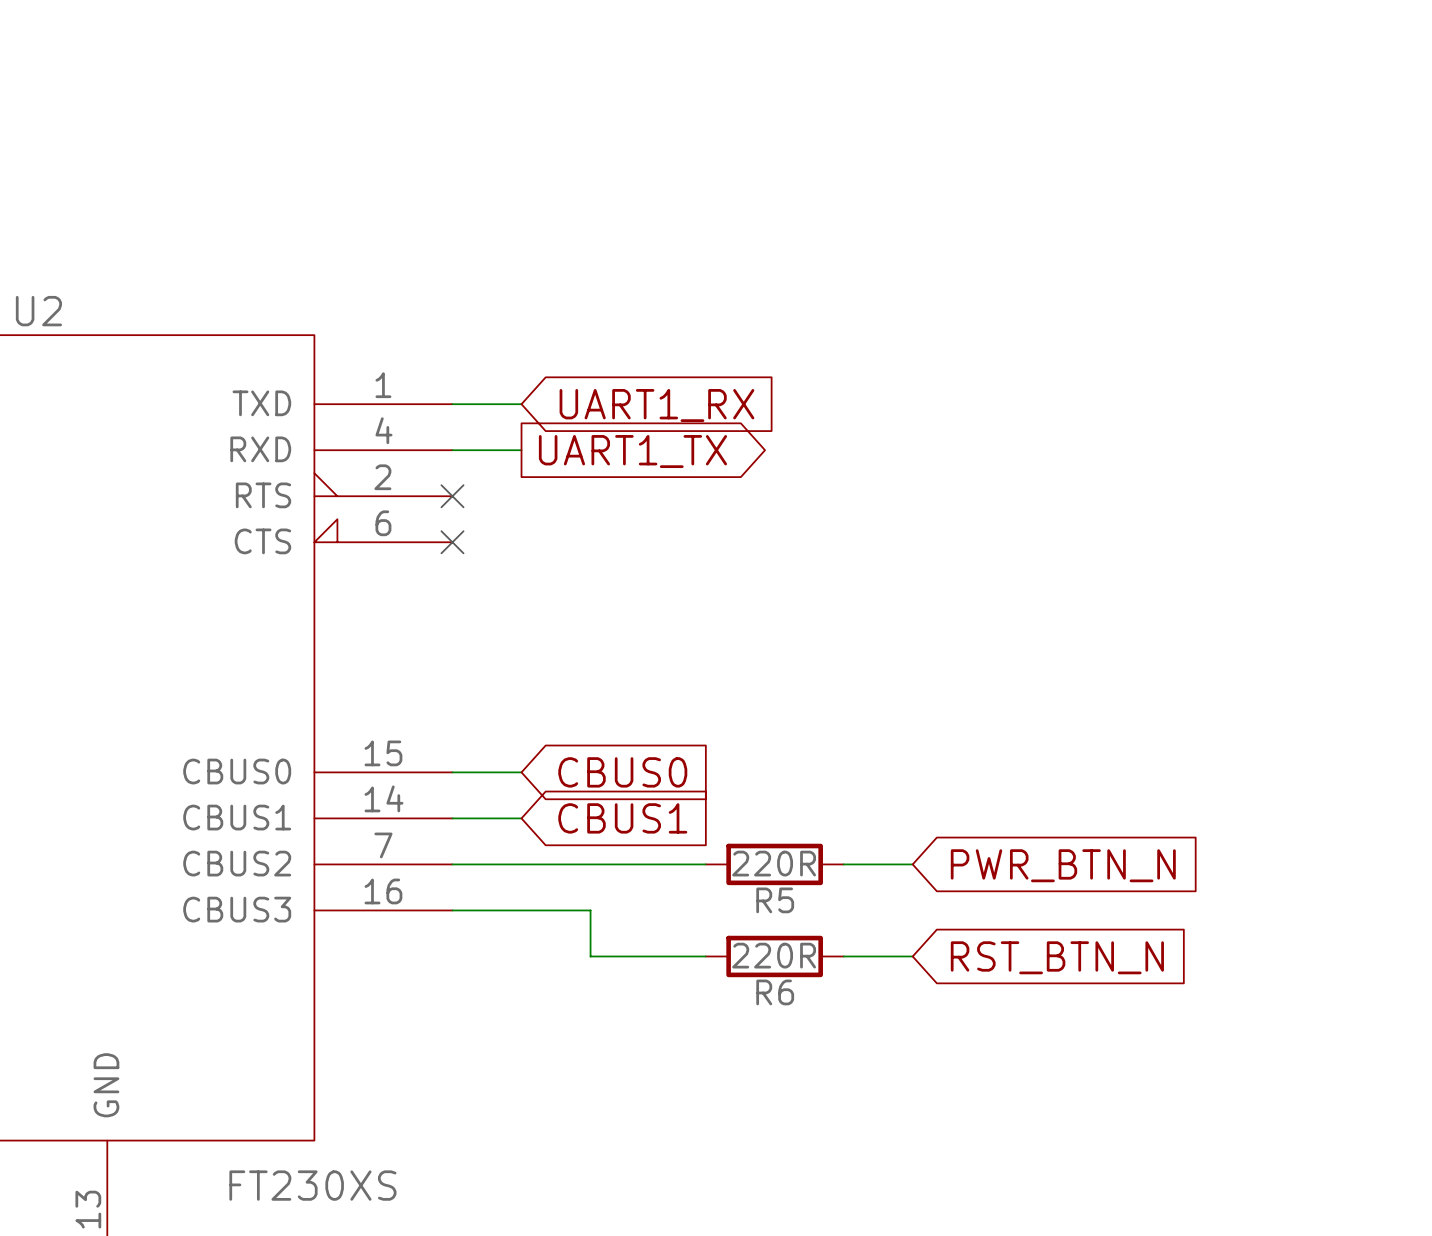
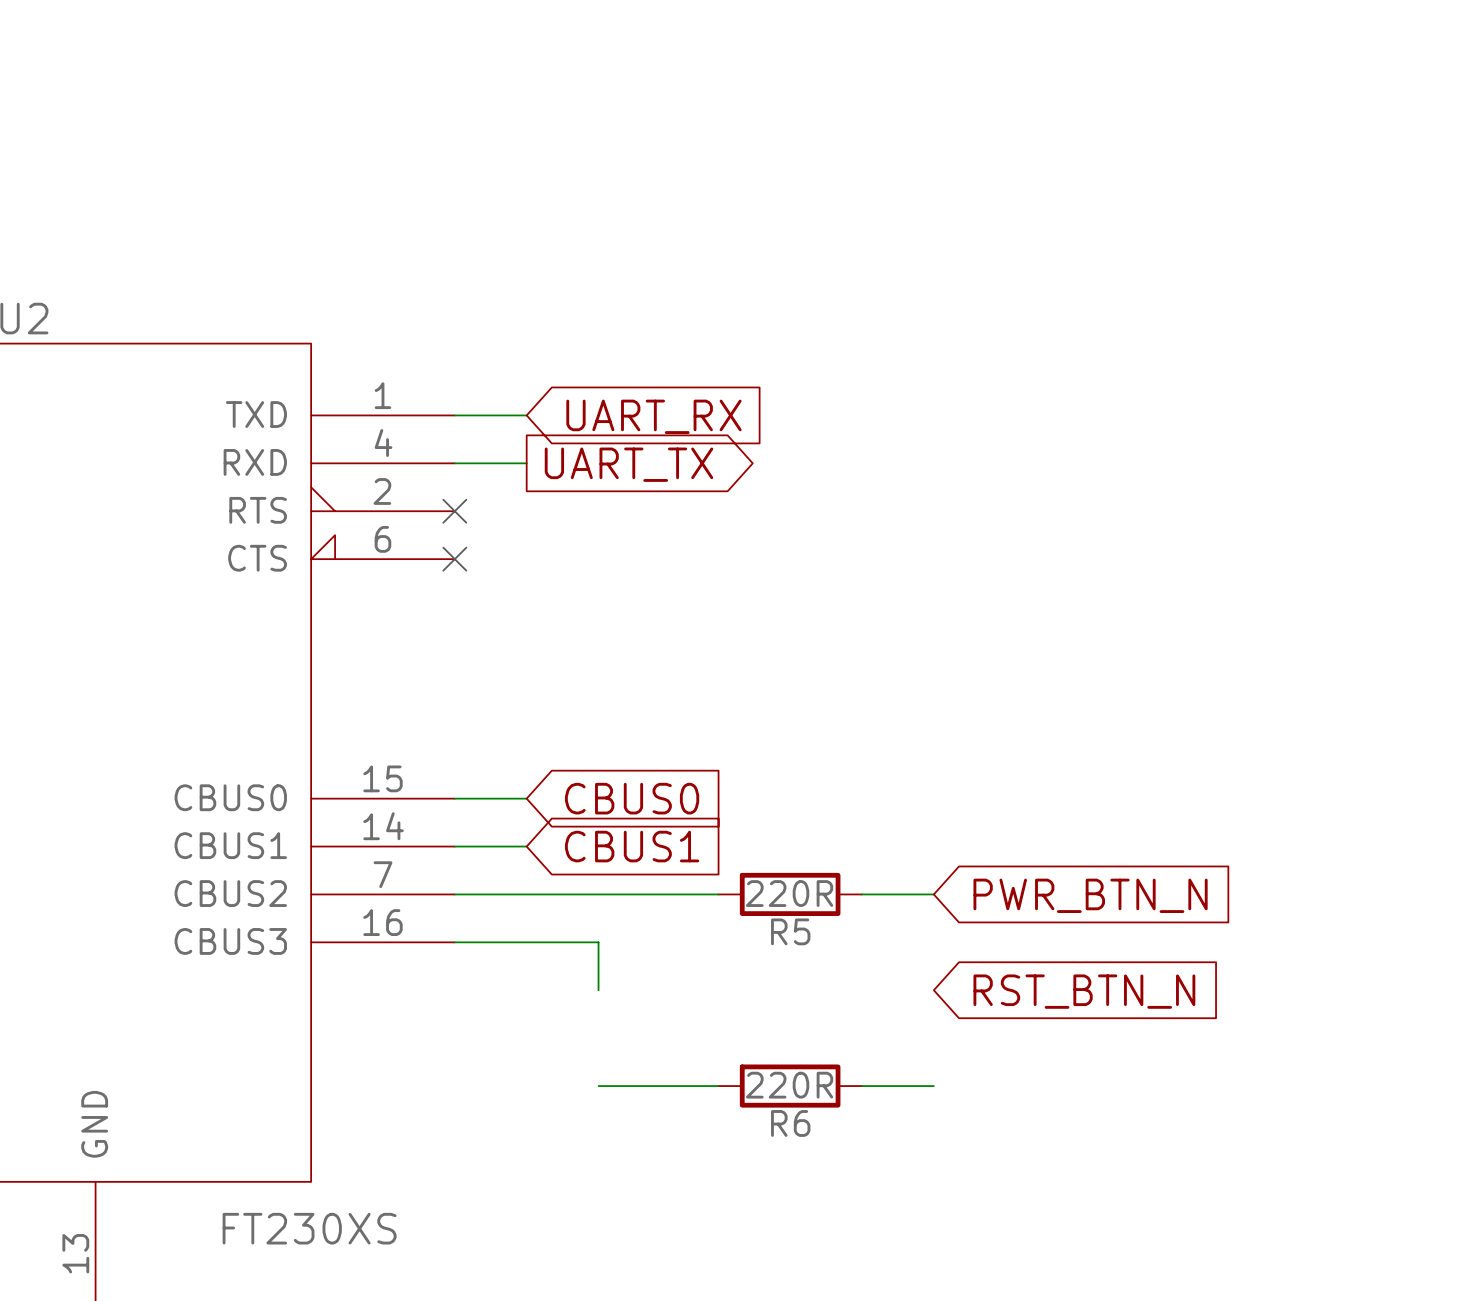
global label: UART1_RX (656, 405) -> UART_RX (653, 416)
global label: UART1_TX (632, 451) -> UART_TX (628, 464)
wire: (590, 956) (705, 956) -> (598, 1086) (718, 1086)
R6 position: (774, 956) -> (790, 1086)
wire: (843, 956) (912, 956) -> (861, 1086) (933, 1086)

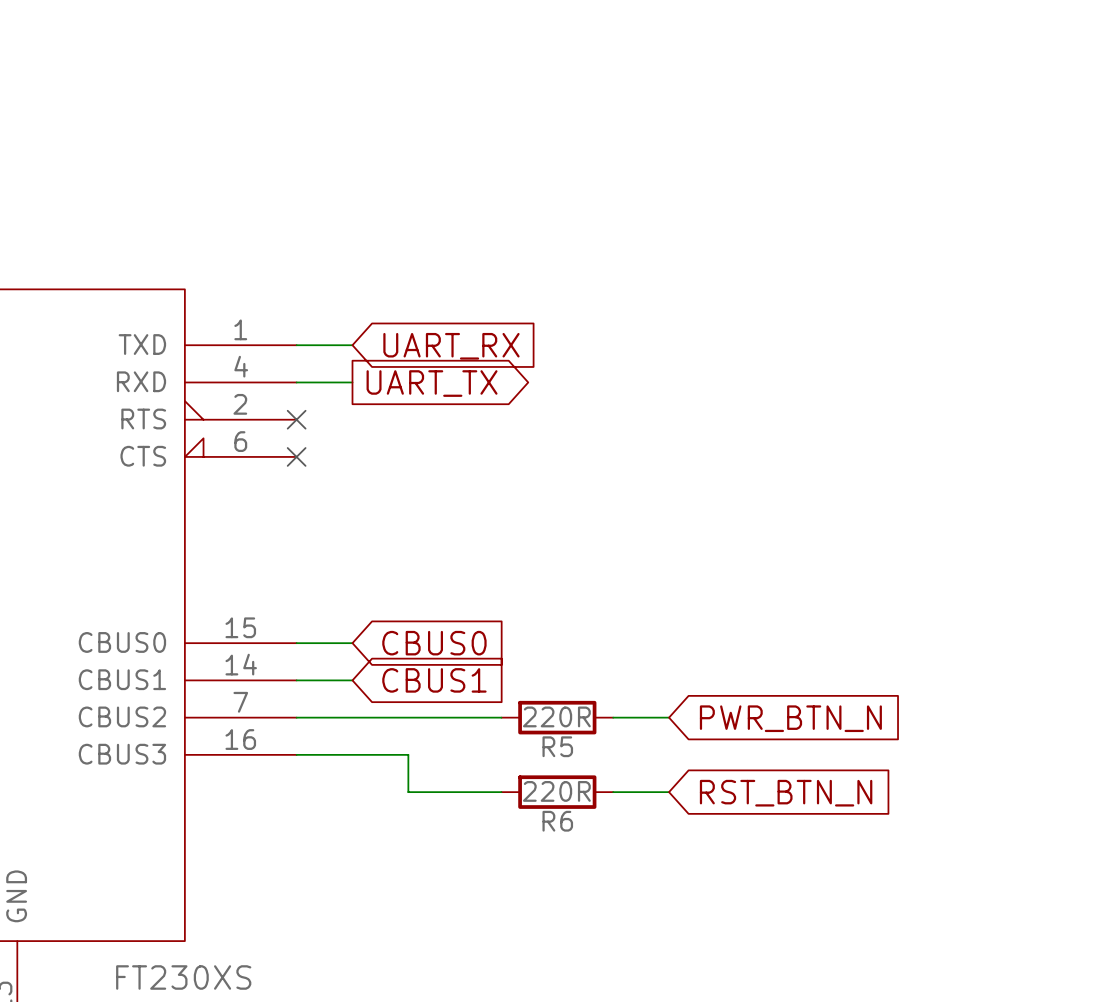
wire: (598, 1086) (718, 1086) -> (408, 792) (501, 792)
R6 position: (790, 1086) -> (557, 792)
wire: (861, 1086) (933, 1086) -> (613, 792) (669, 792)

